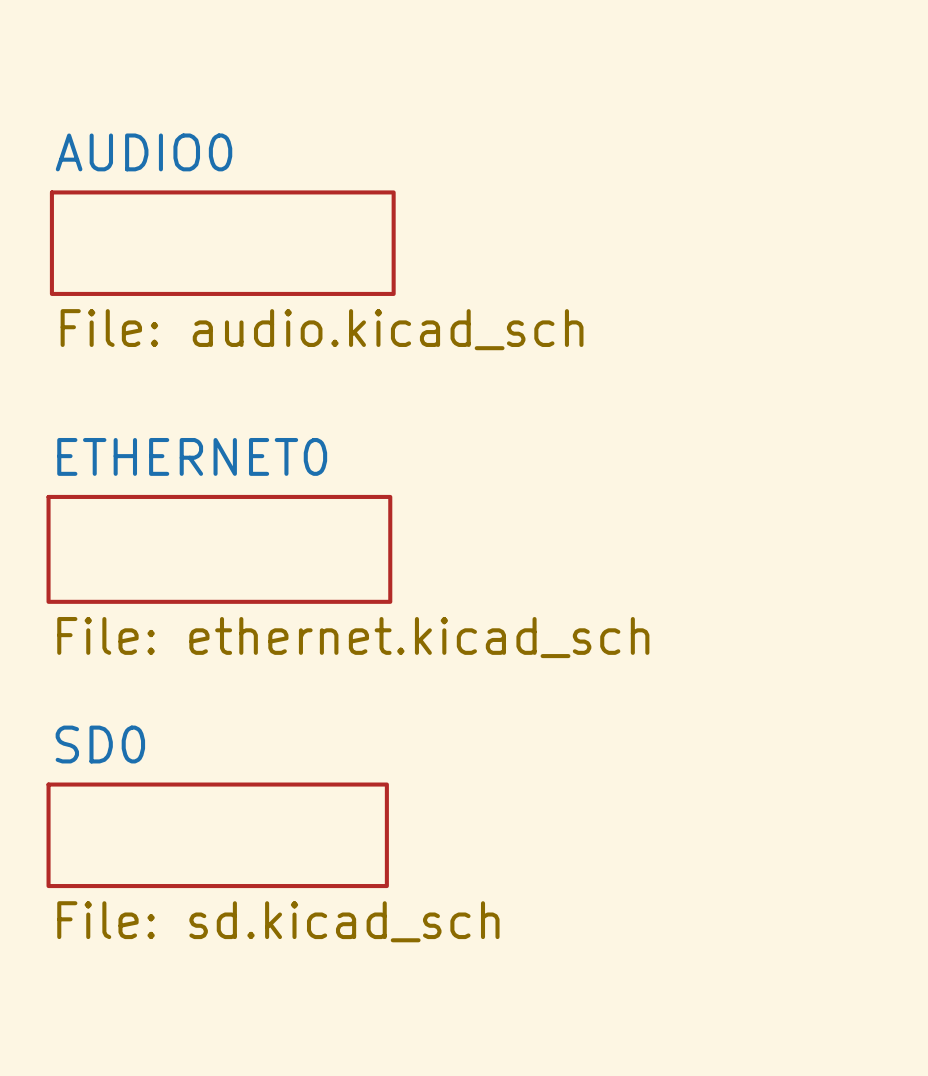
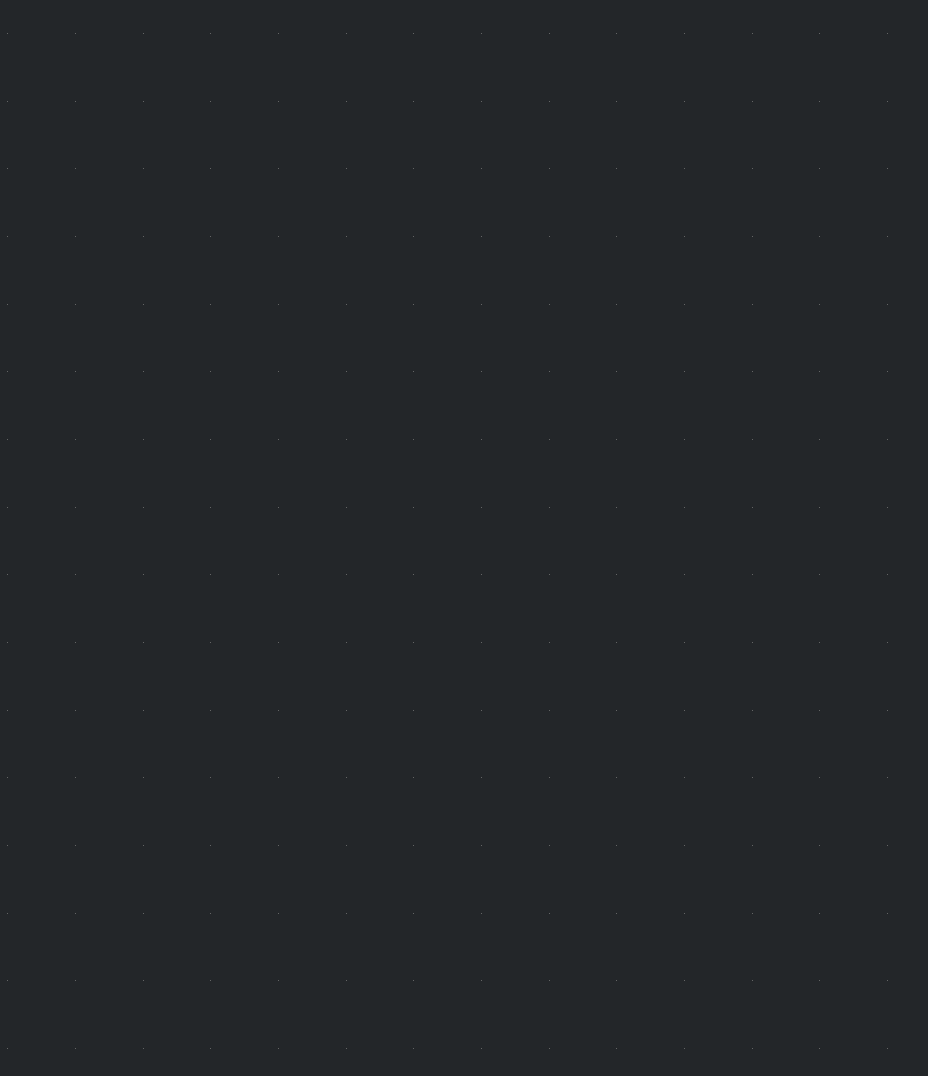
sheet AUDIO0: File: audio.kicad_sch (222, 243) -> none
sheet ETHERNET0: File: ethernet.kicad_sch (219, 549) -> none
sheet SD0: File: sd.kicad_sch (217, 835) -> none

